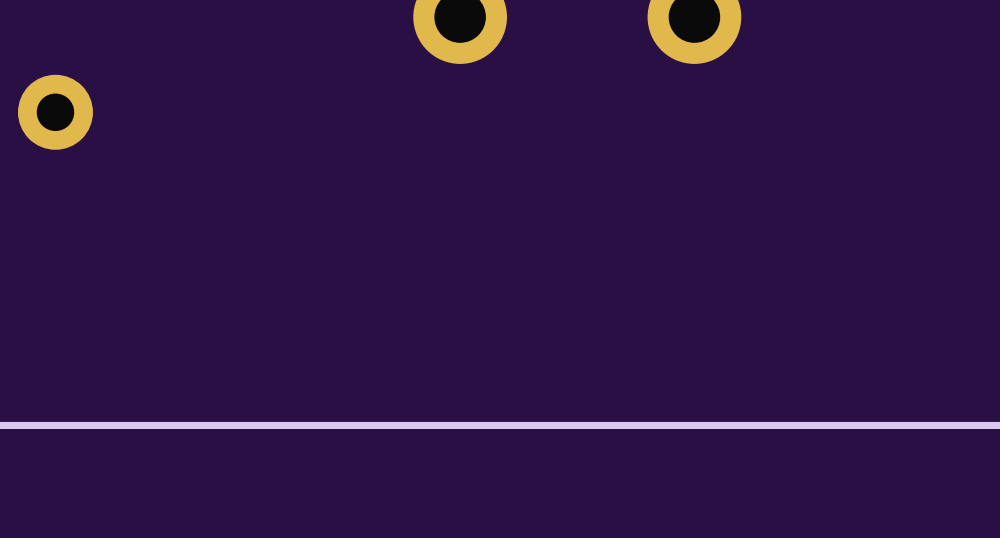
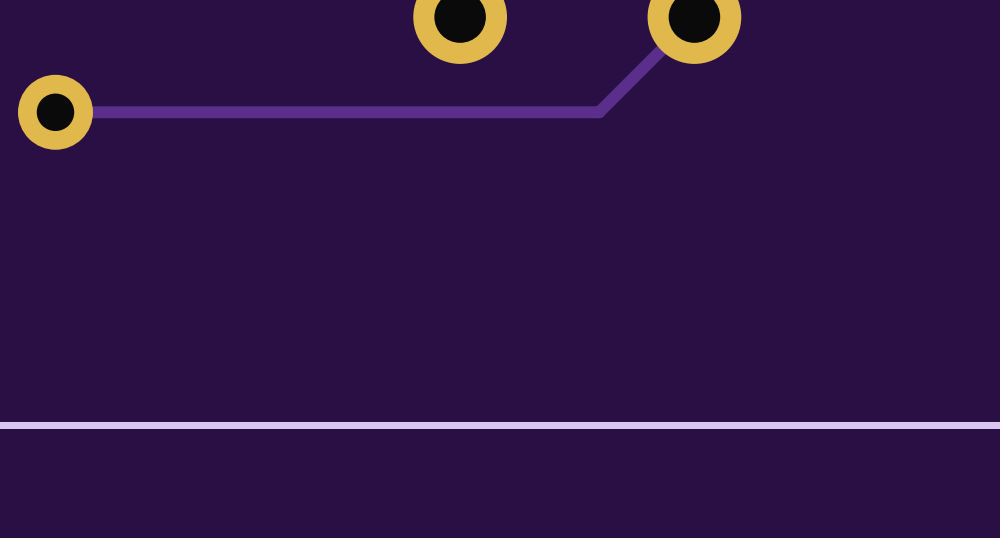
track: none -> (694, 17) (599, 112) (55, 112)

